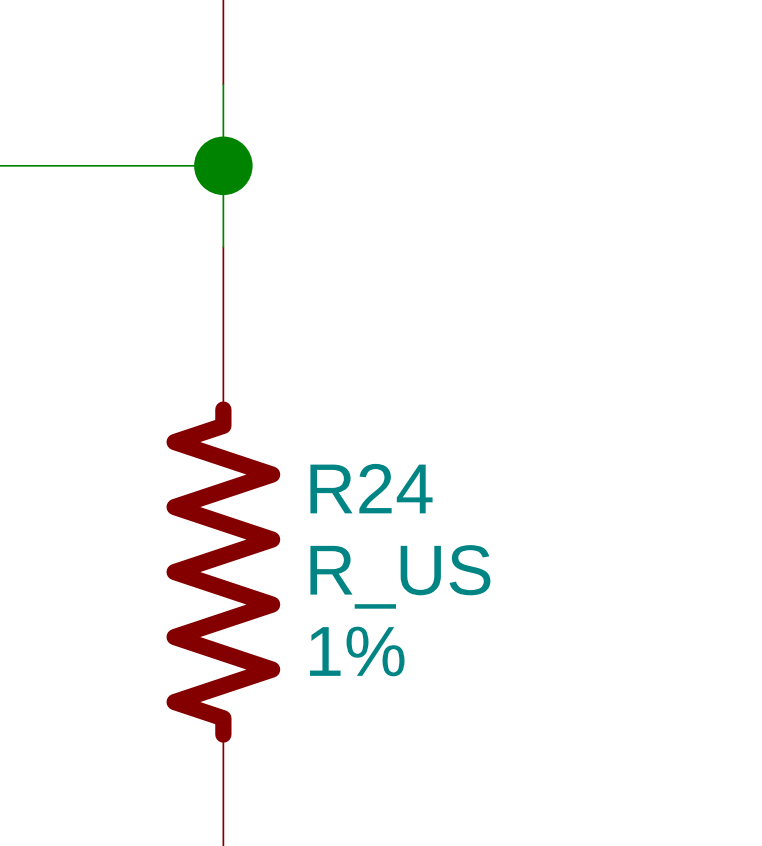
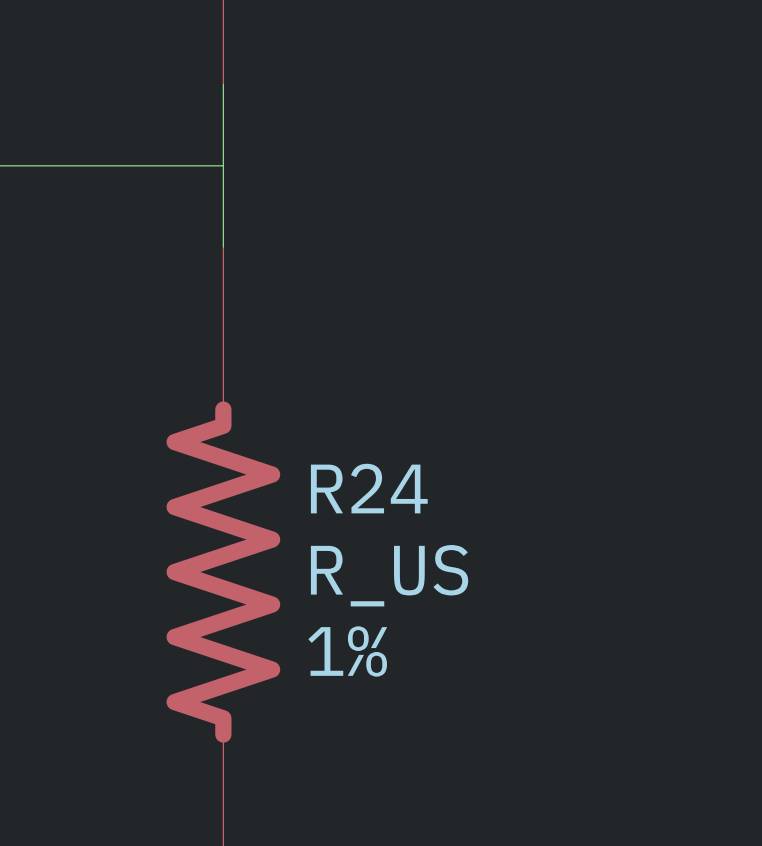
junction: (223, 165) -> none

